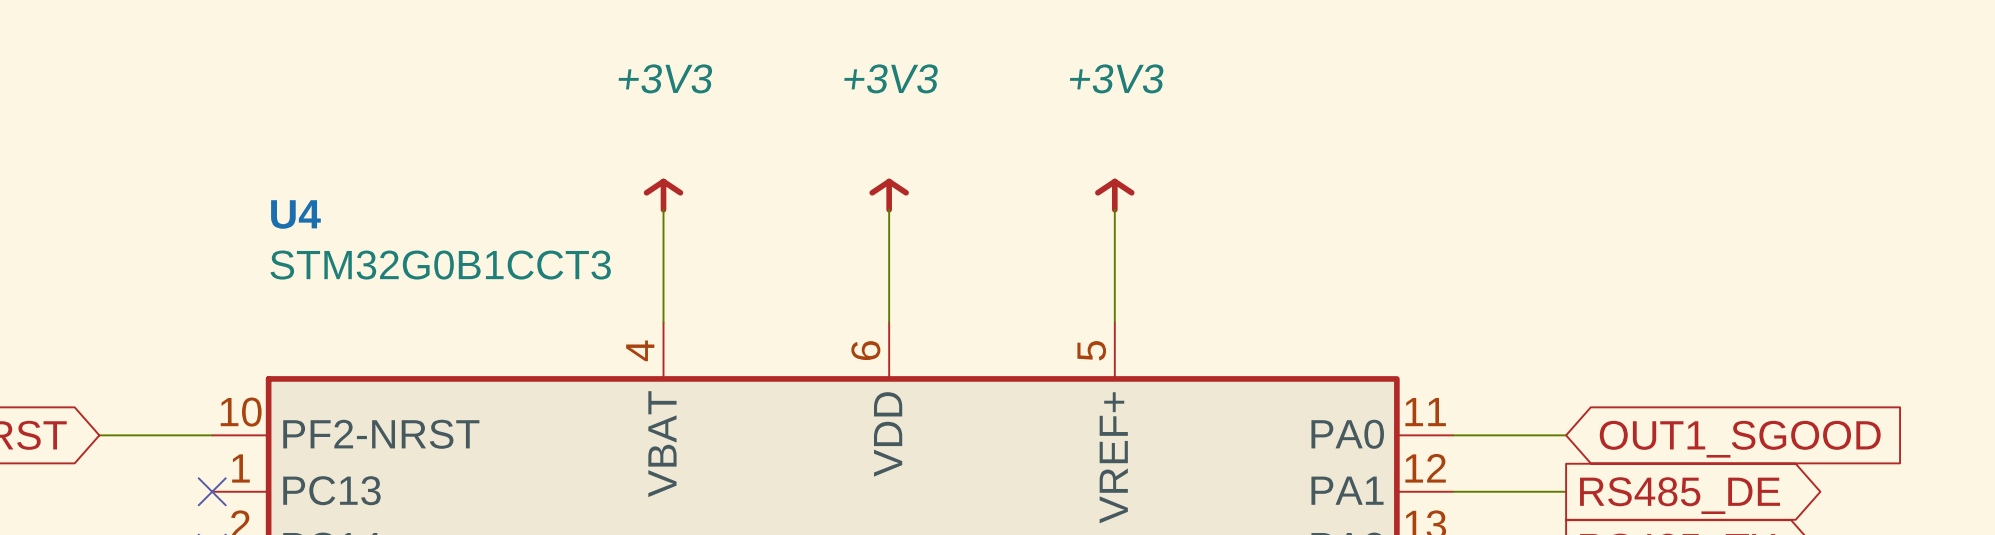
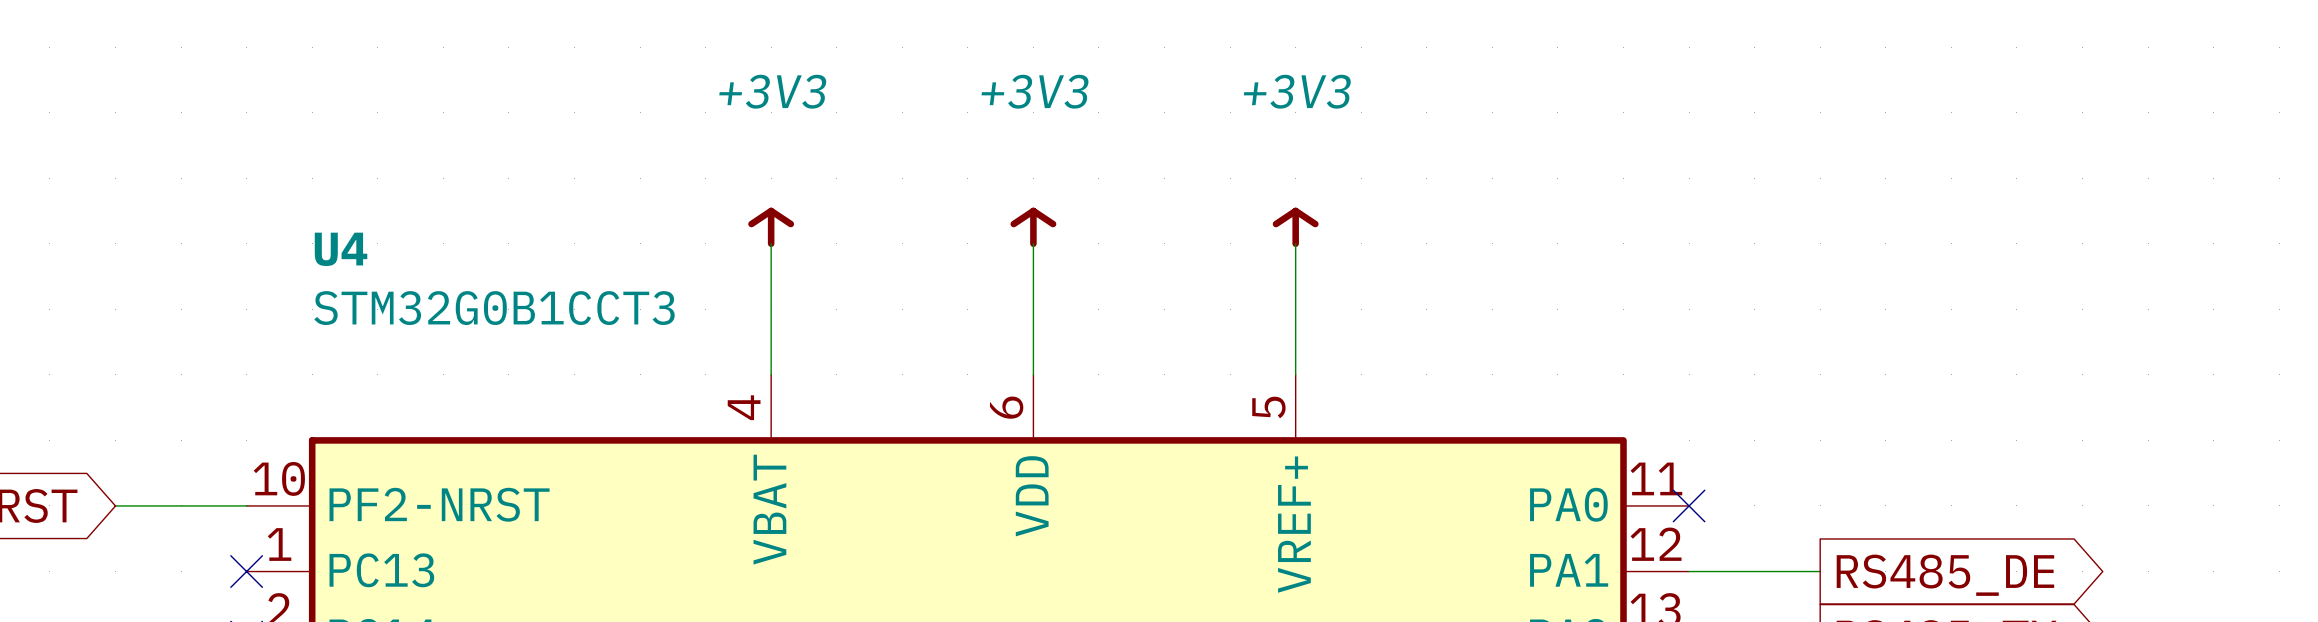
wire: (1453, 435) (1566, 435) -> none
no-connect mark: none -> (1689, 505)
global label: OUT1_SGOOD (1740, 439) -> none

